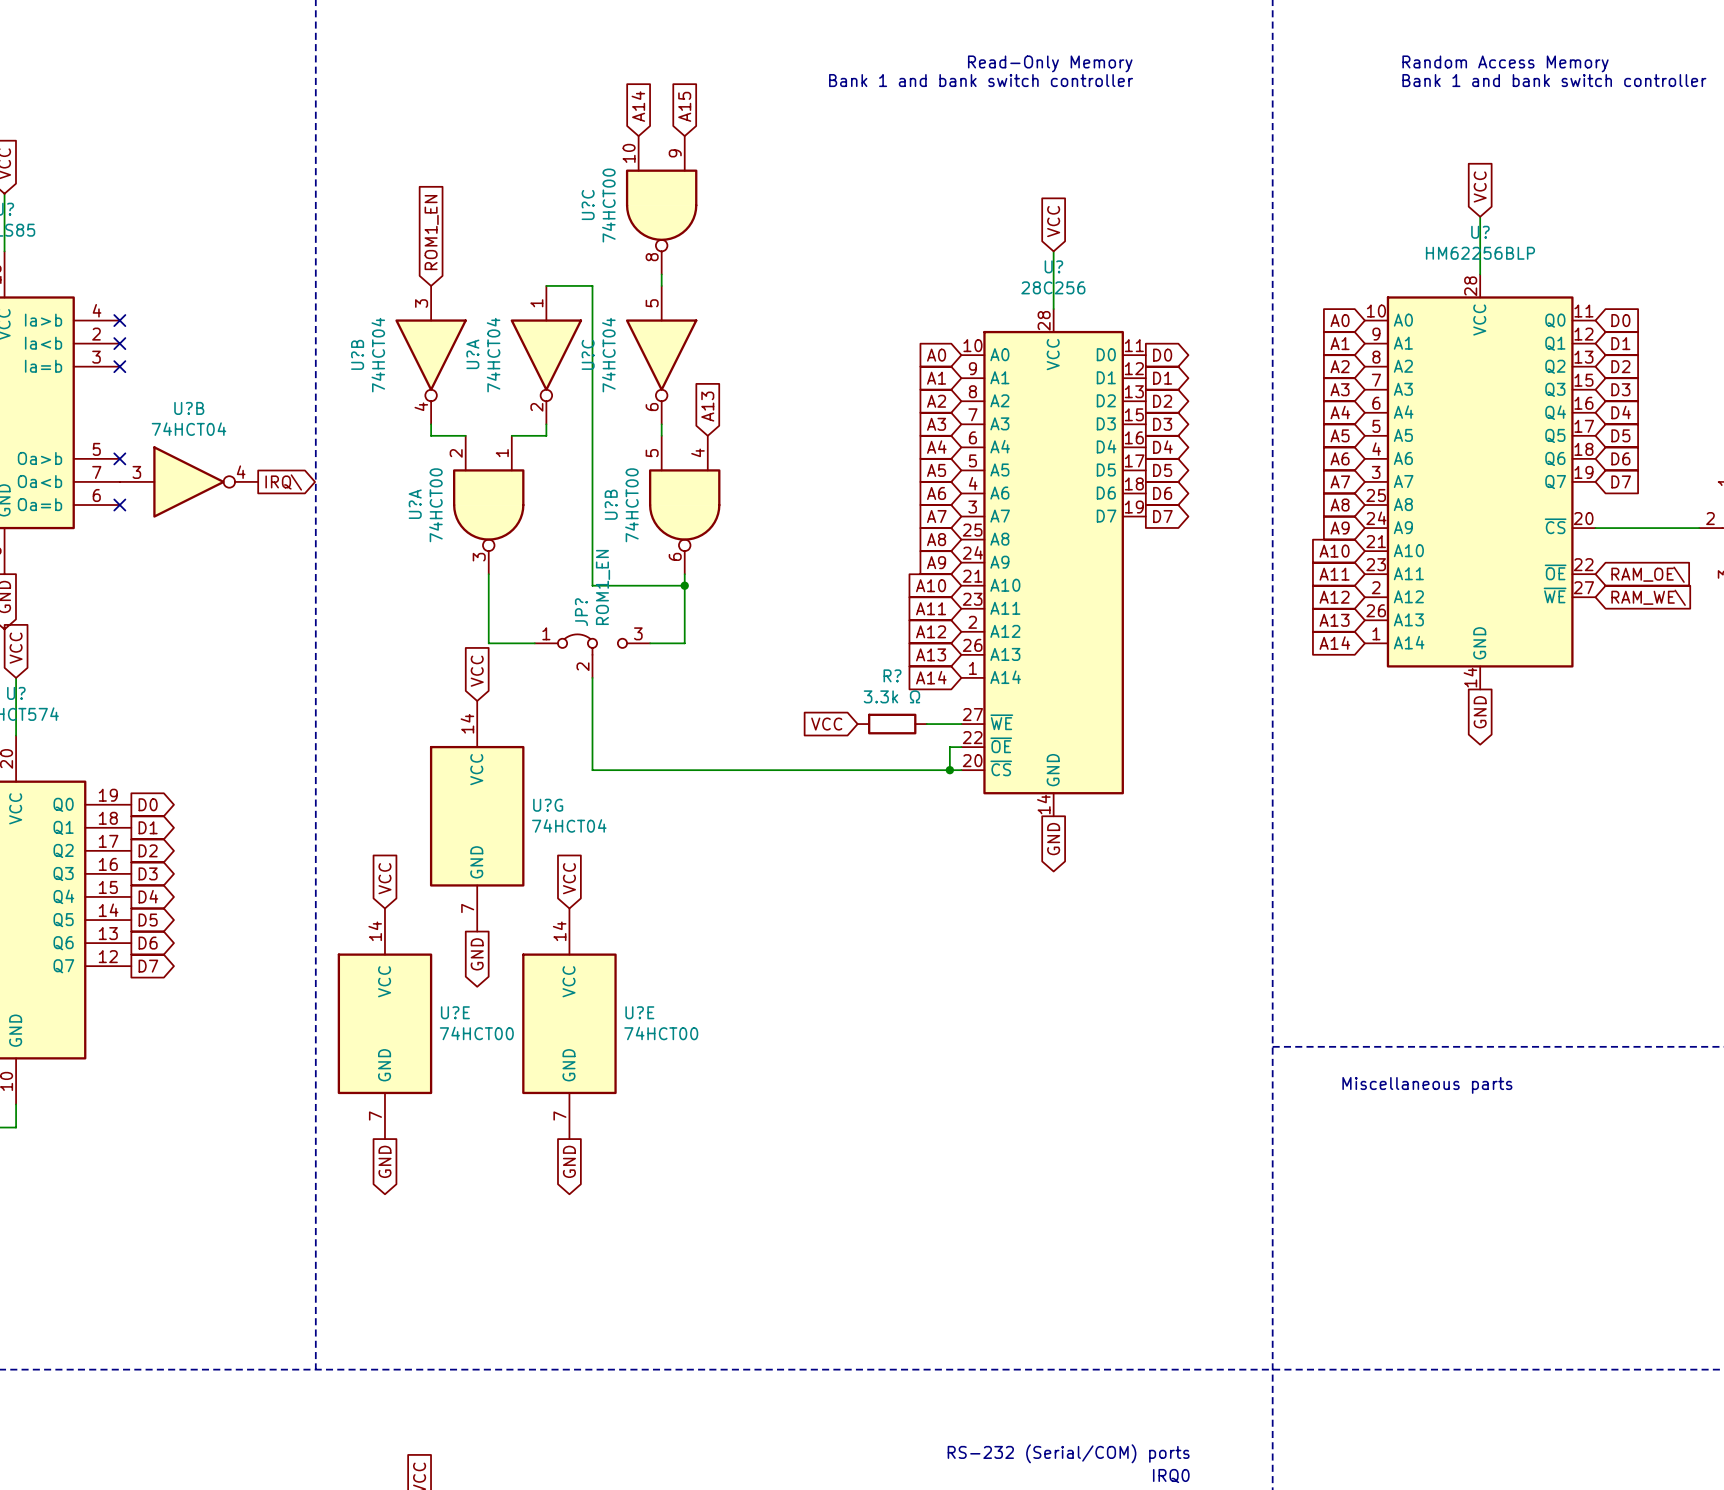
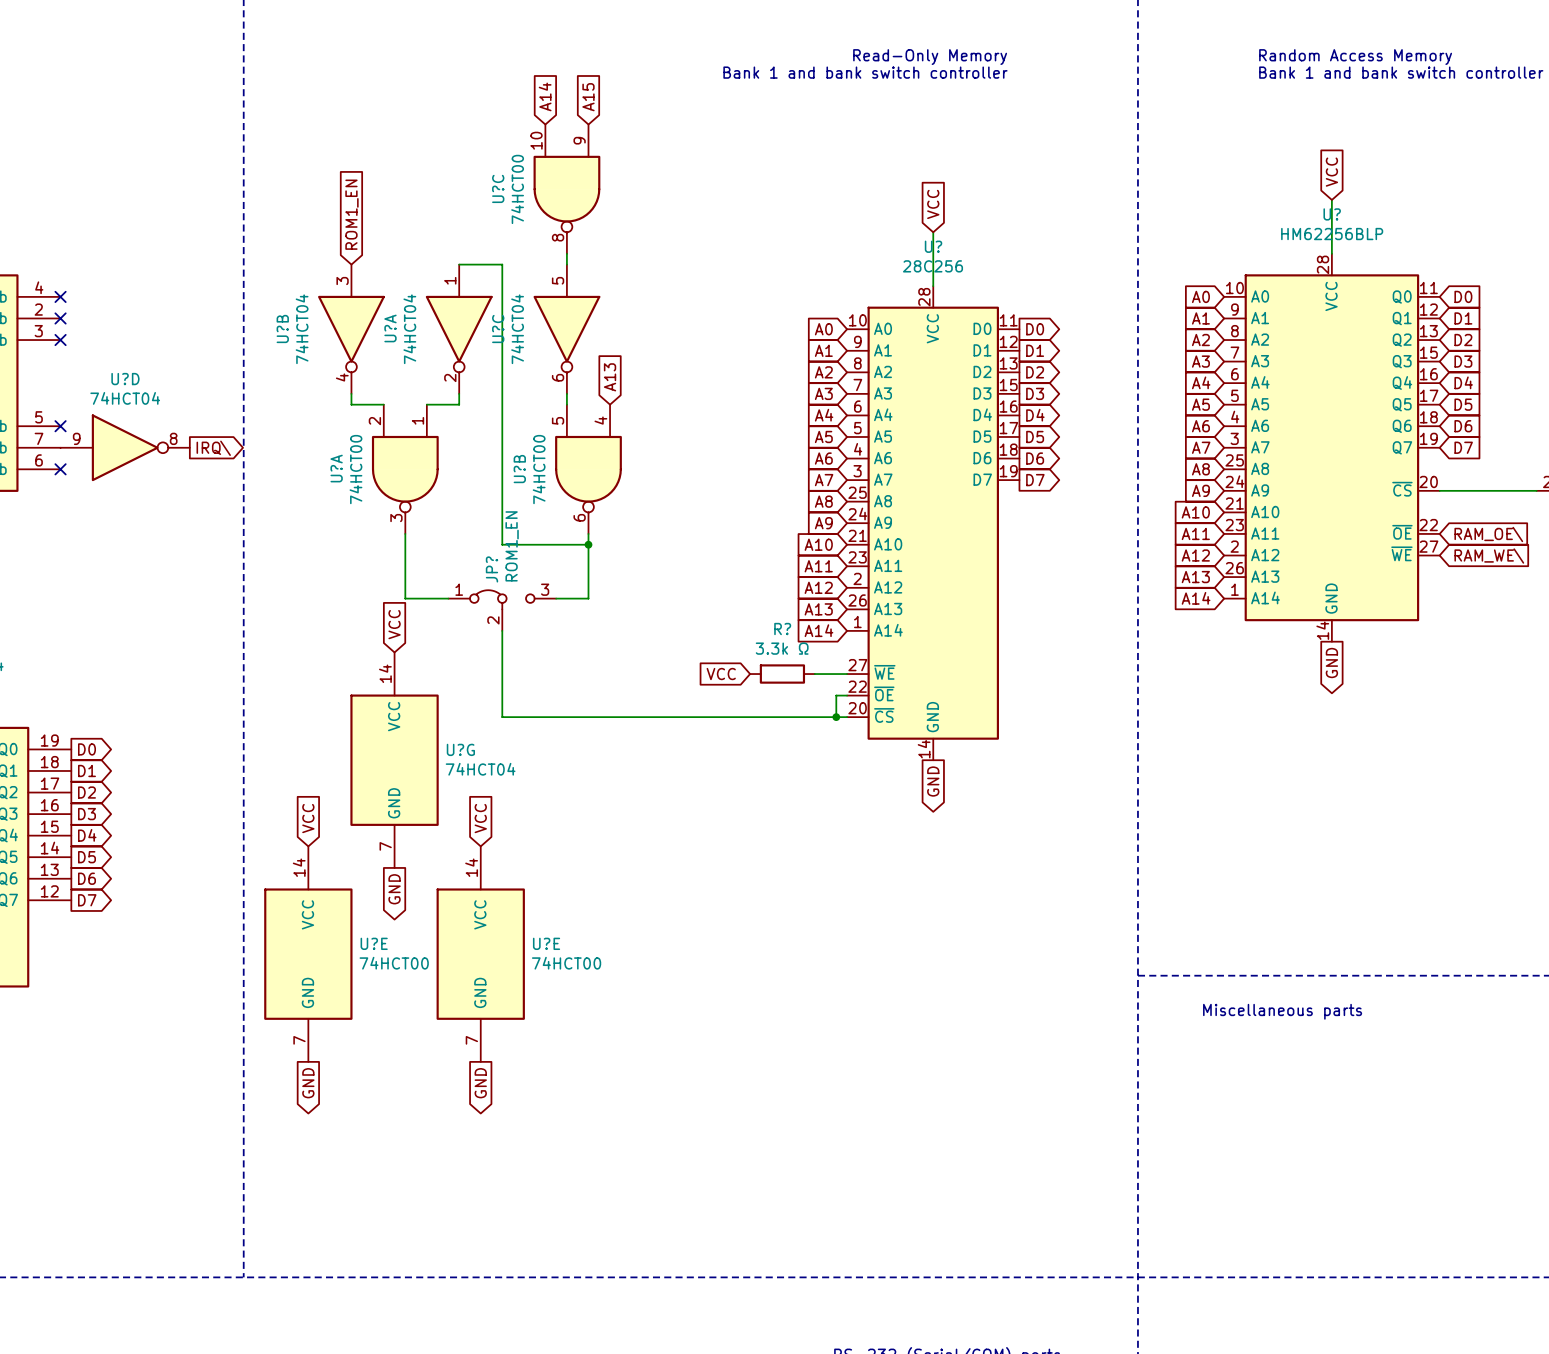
U?B name: U?B (189, 408) -> U?D (125, 379)
U?B pin number: 3 (136, 472) -> 9 (76, 438)
U?B pin number: 4 (241, 472) -> 8 (173, 438)

